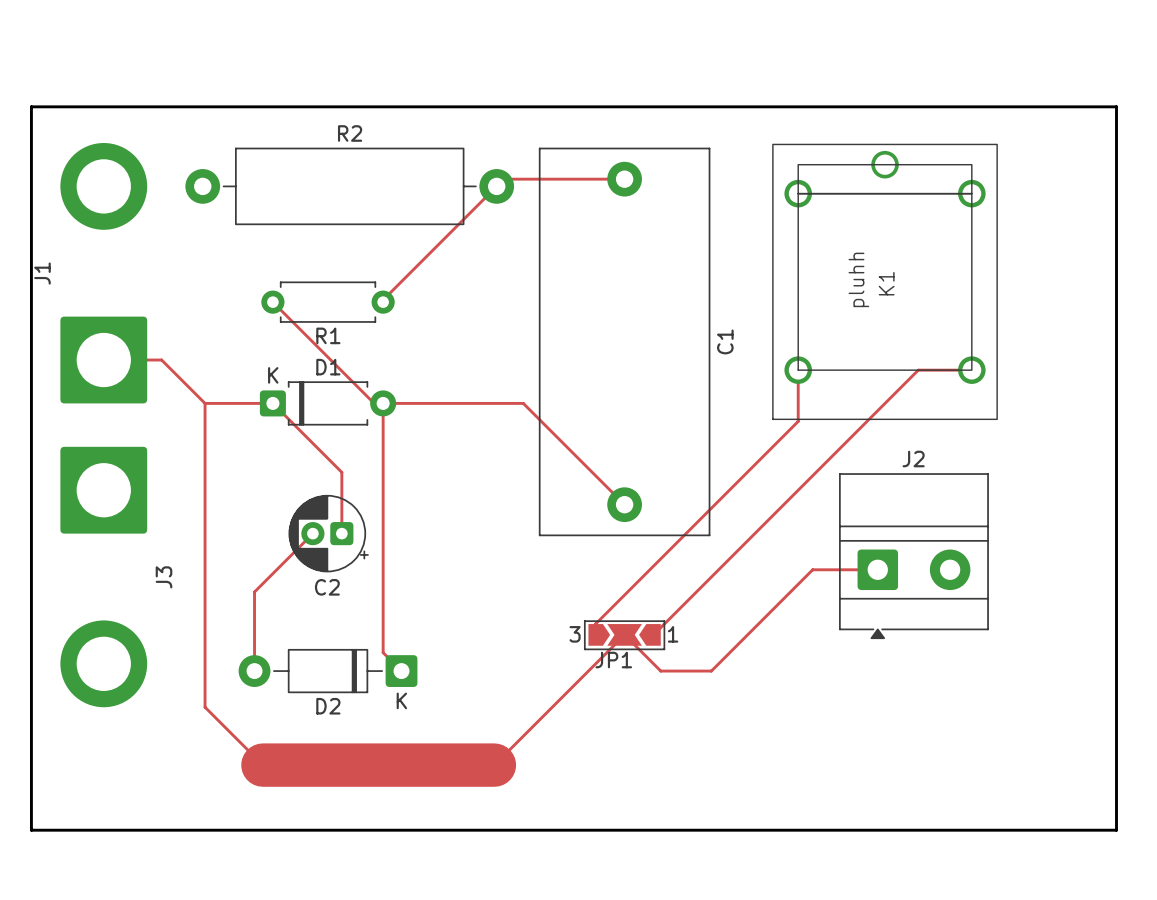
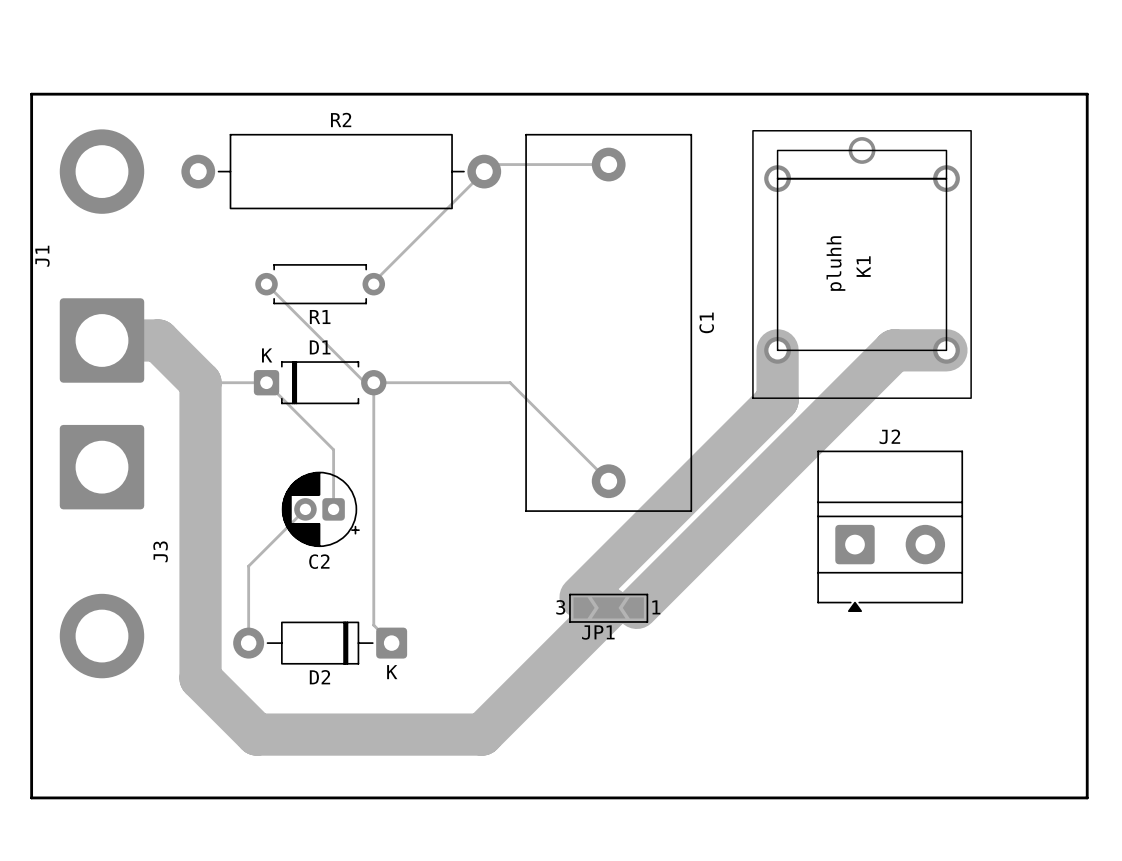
track width: thin (103, 360) (161, 360) (205, 403) (205, 707) (262, 765) -> thick (101, 340) (158, 340) (200, 382) (200, 678) (256, 734)
track width: thin (798, 370) (798, 421) (595, 623) -> thick (777, 350) (777, 400) (580, 597)
track width: thin (971, 370) (918, 370) (653, 634) -> thick (946, 350) (894, 350) (636, 607)
track: (877, 569) (812, 569) (711, 671) (660, 671) (624, 634) -> none
track width: thin (624, 634) (494, 765) -> thick (608, 607) (482, 734)

